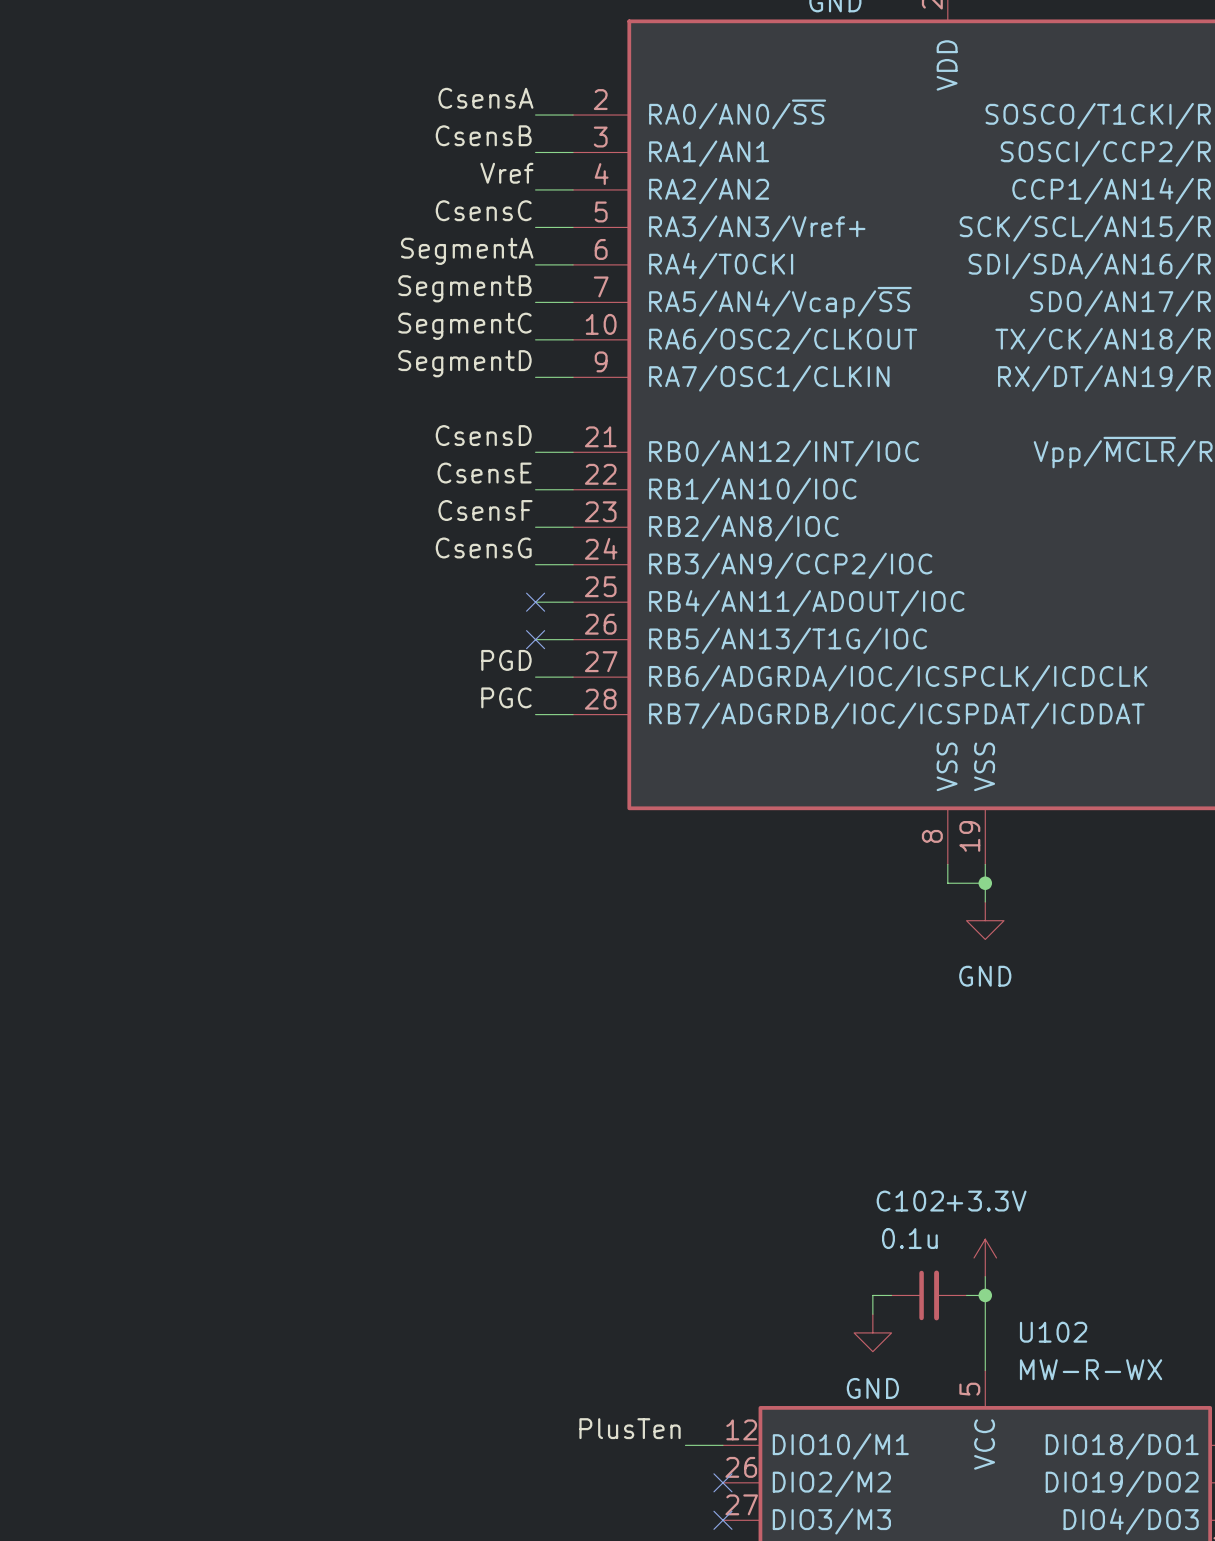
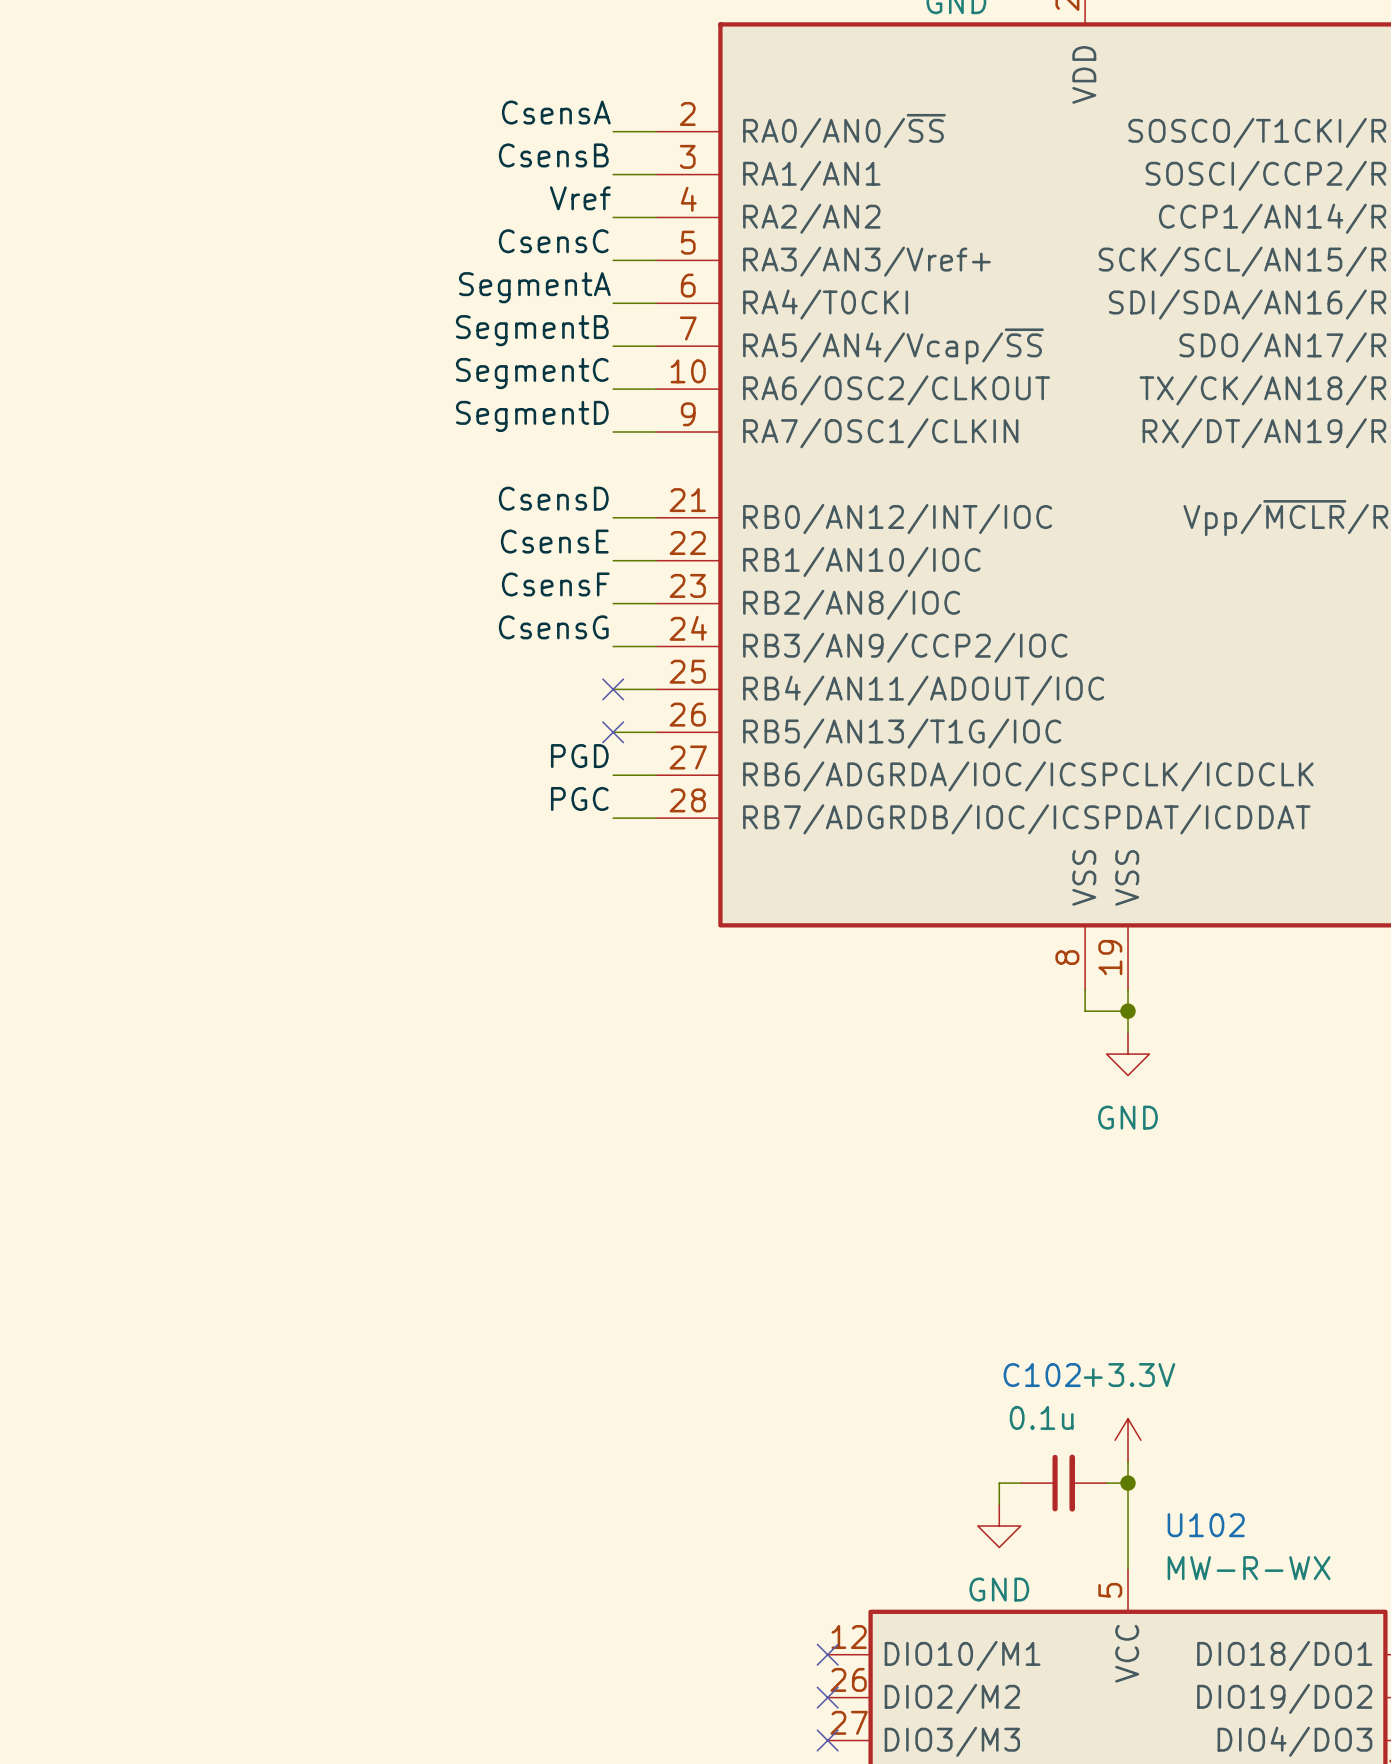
label: PlusTen (630, 1428) -> none
wire: (685, 1445) (722, 1445) -> none
no-connect mark: none -> (827, 1654)

